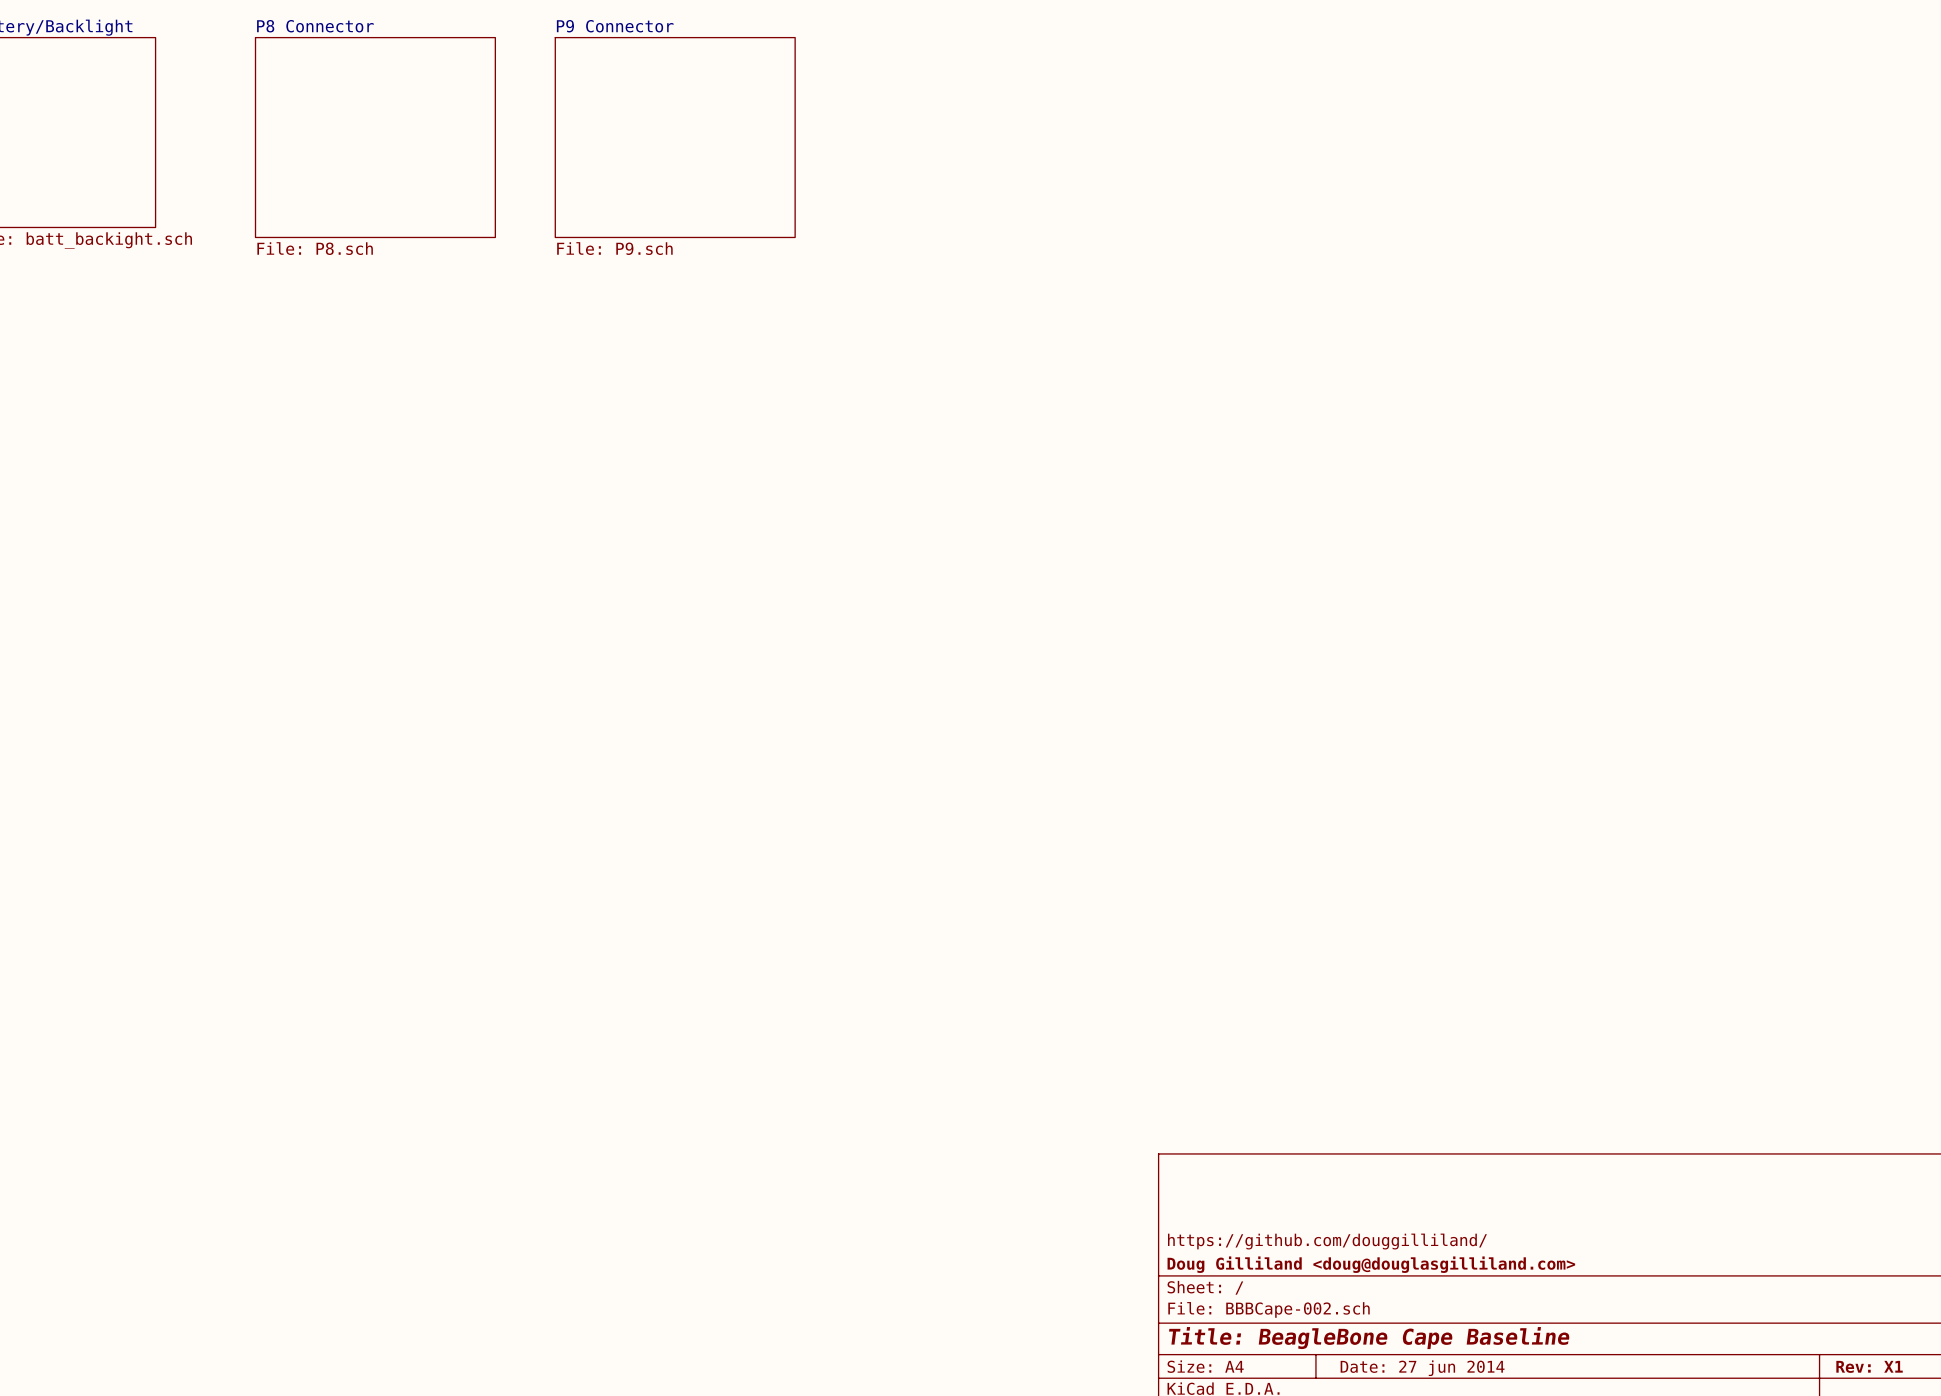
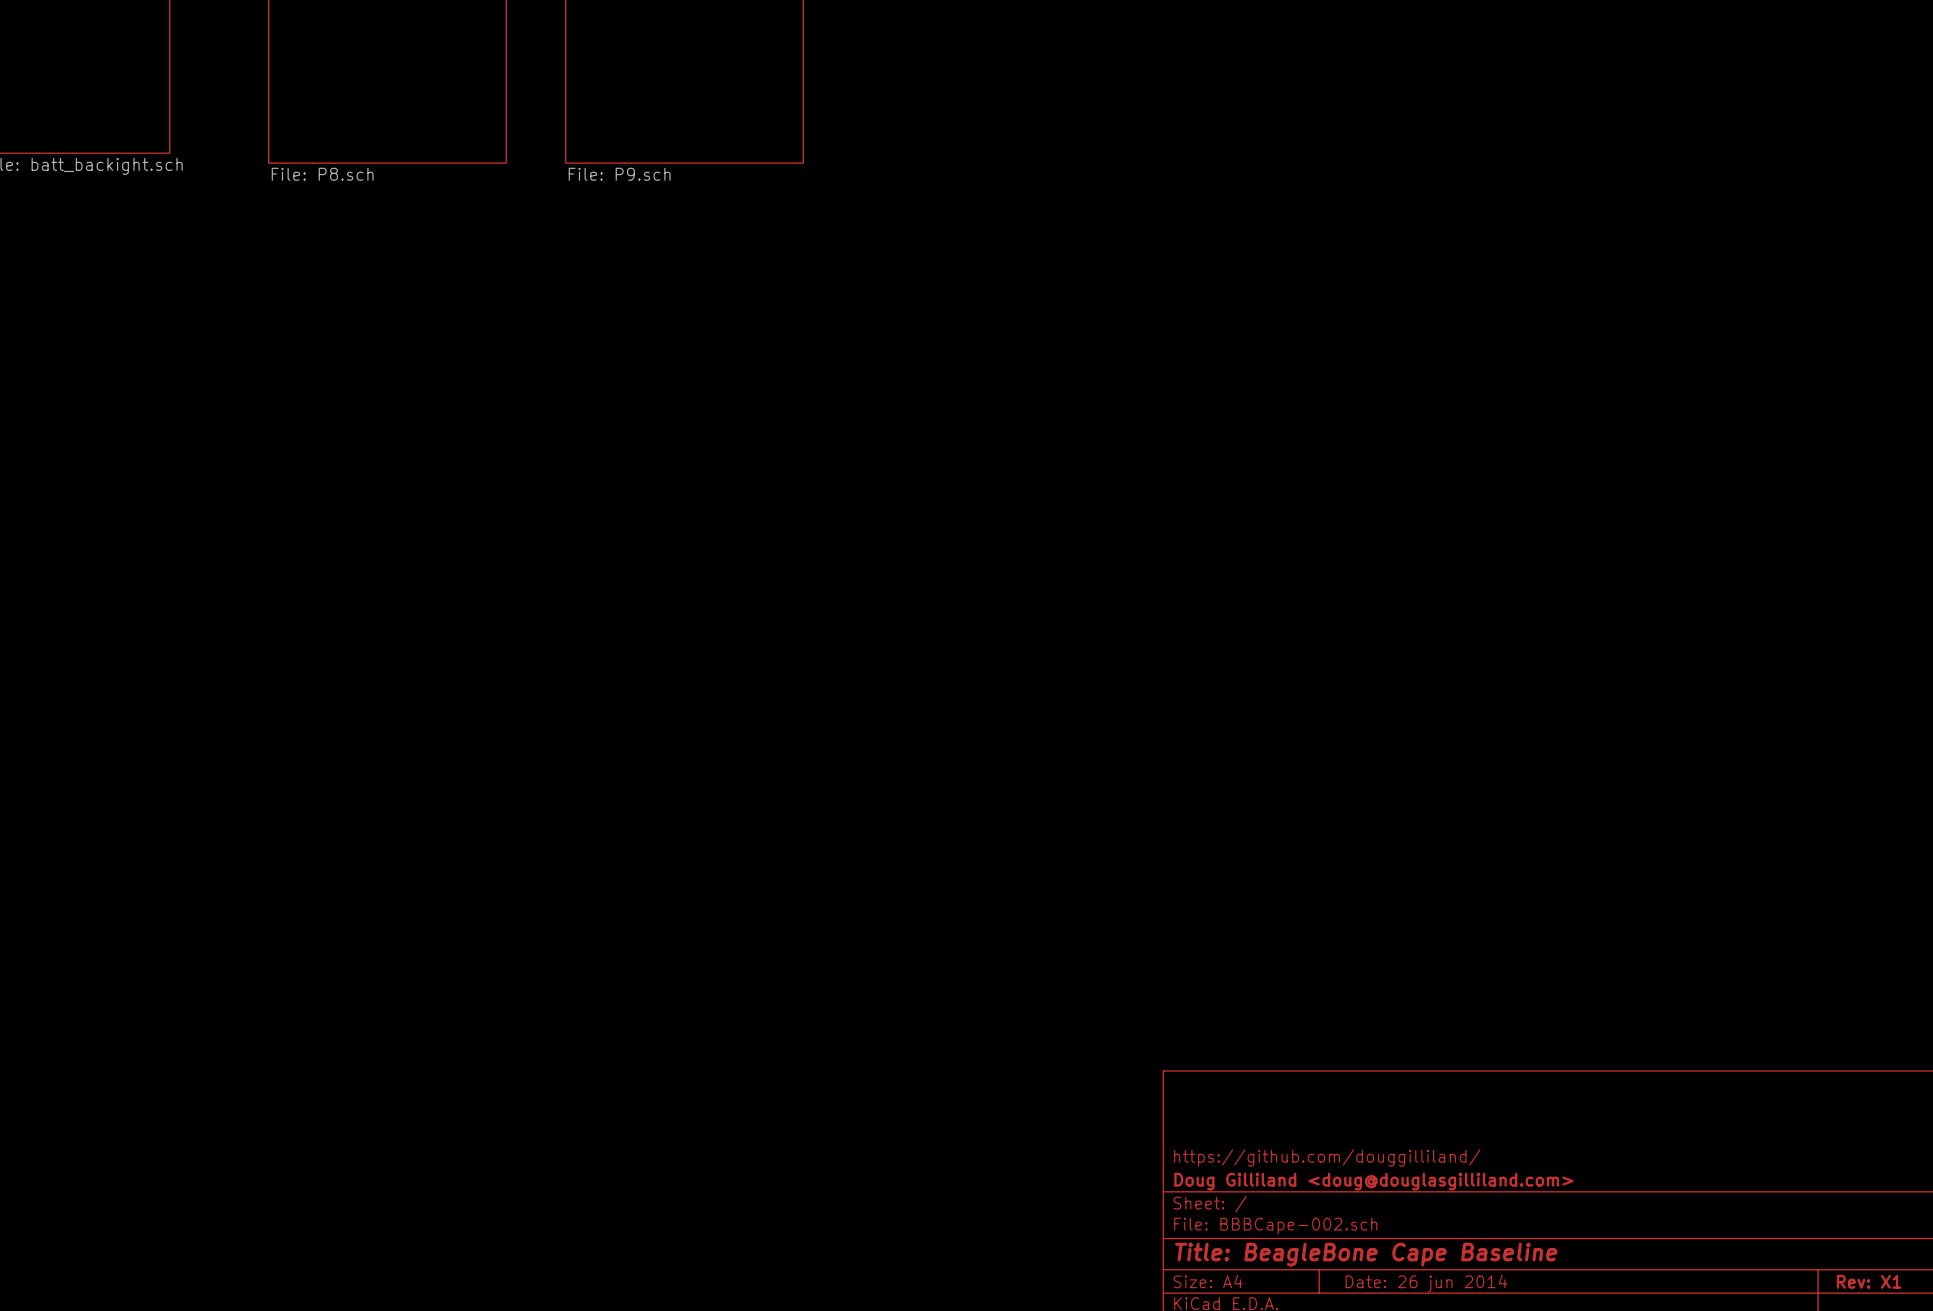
title block: Date: 27 jun 2014 (1422, 1368) -> Date: 26 jun 2014 (1426, 1283)

